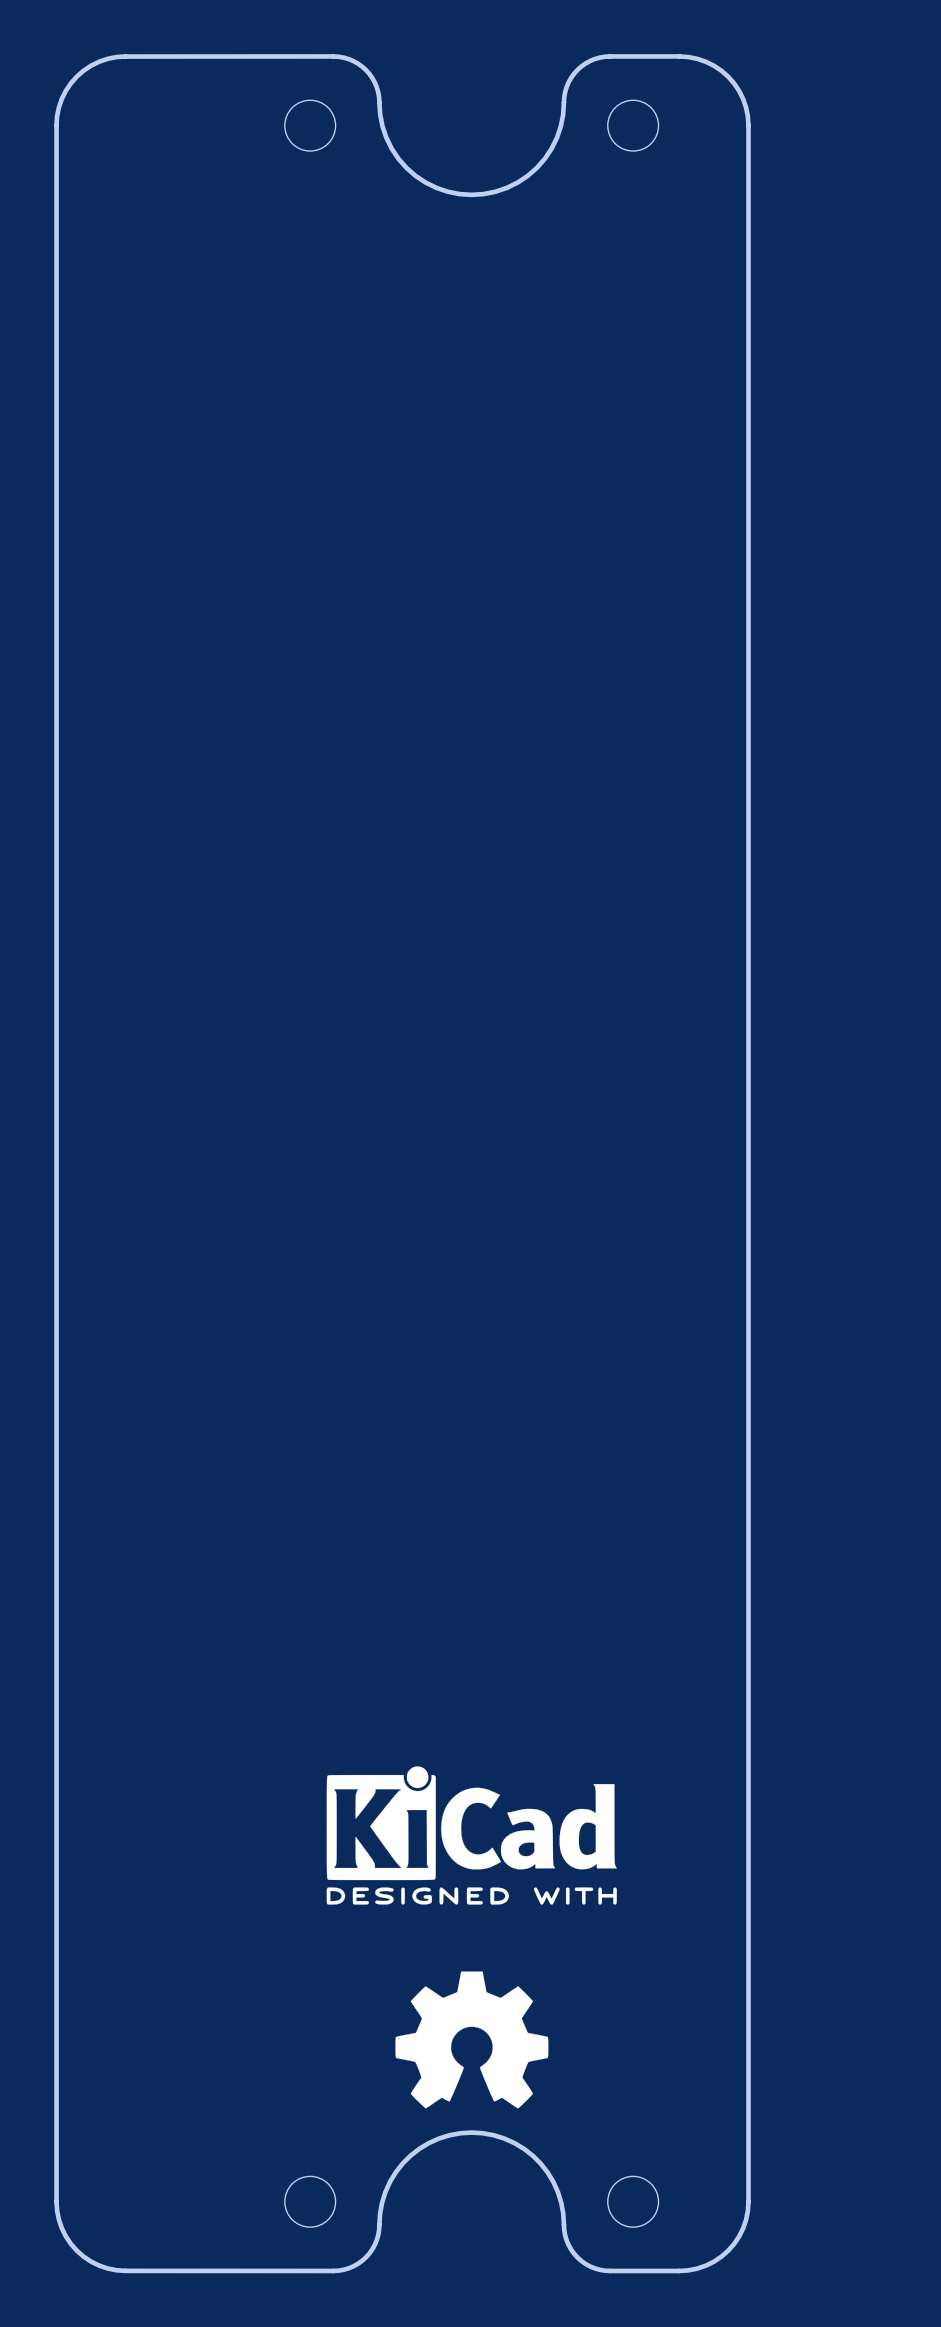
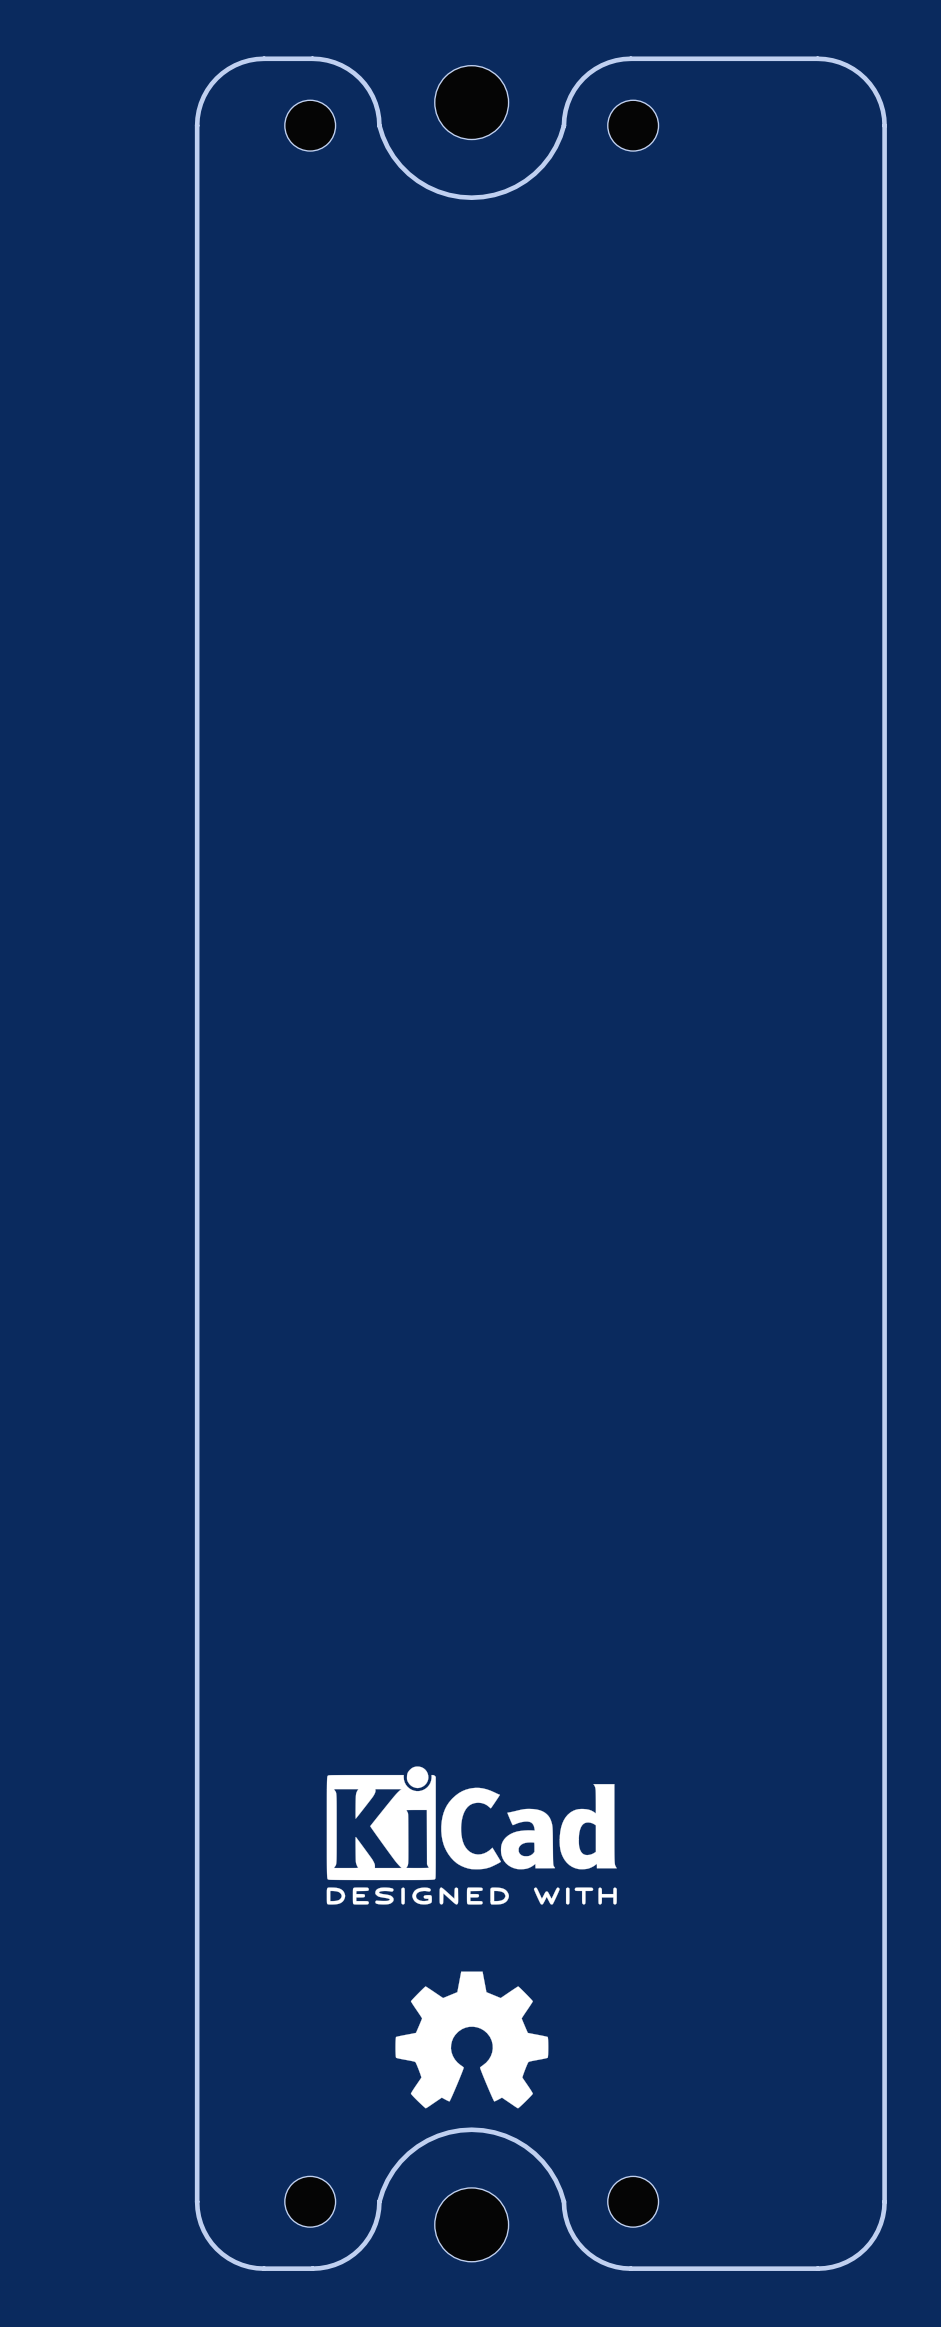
board edge: (679, 56) (604, 56) (585, 63) (574, 73) (568, 82) (565, 92) (560, 126) (551, 148) (544, 158) (527, 175) (517, 182) (495, 191) (483, 194) (459, 194) (447, 191) (425, 182) (406, 167) (398, 158) (386, 137) (380, 114) (378, 92) (372, 78) (357, 63) (343, 57) (116, 57) (99, 61) (76, 76) (65, 91) (58, 107) (56, 125) (56, 2201) (61, 2228) (70, 2243) (83, 2256) (107, 2268) (125, 2270) (333, 2270) (348, 2268) (362, 2260) (374, 2244) (385, 2192) (402, 2163) (428, 2143) (460, 2133) (482, 2133) (504, 2138) (524, 2148) (540, 2163) (557, 2192) (568, 2244) (581, 2260) (594, 2268) (610, 2270) (679, 2270) (697, 2268) (713, 2261) (728, 2250) (739, 2236) (746, 2219) (748, 2201) (748, 125) (743, 99) (728, 76) (705, 61) (679, 56) -> (817, 58) (839, 62) (853, 69) (864, 78) (877, 96) (882, 110) (884, 125) (884, 2201) (882, 2216) (874, 2237) (864, 2249) (853, 2258) (832, 2266) (817, 2268) (630, 2268) (615, 2266) (595, 2258) (578, 2243) (567, 2223) (563, 2201) (555, 2180) (534, 2153) (515, 2140) (494, 2132) (460, 2130) (427, 2140) (400, 2161) (382, 2190) (372, 2230) (364, 2243) (348, 2258) (334, 2264) (319, 2268) (249, 2266) (228, 2258) (211, 2243) (200, 2223) (197, 2201) (197, 125) (198, 110) (203, 96) (211, 83) (222, 73) (241, 62) (264, 58) (312, 58) (334, 62) (354, 73) (369, 90) (375, 103) (379, 125) (387, 147) (408, 173) (438, 191) (460, 197) (483, 197) (515, 186) (542, 165) (560, 136) (567, 103) (574, 90) (589, 73) (608, 62) (630, 58) (817, 58)
drawing: [284, 99, 337, 152] -> none
drawing: [607, 99, 660, 152] -> none
part: none -> (471, 102)
part: none -> (310, 125)
part: none -> (633, 125)
drawing: [284, 2175, 337, 2228] -> none
drawing: [607, 2175, 660, 2228] -> none
part: none -> (310, 2201)
part: none -> (633, 2201)
part: none -> (471, 2224)

